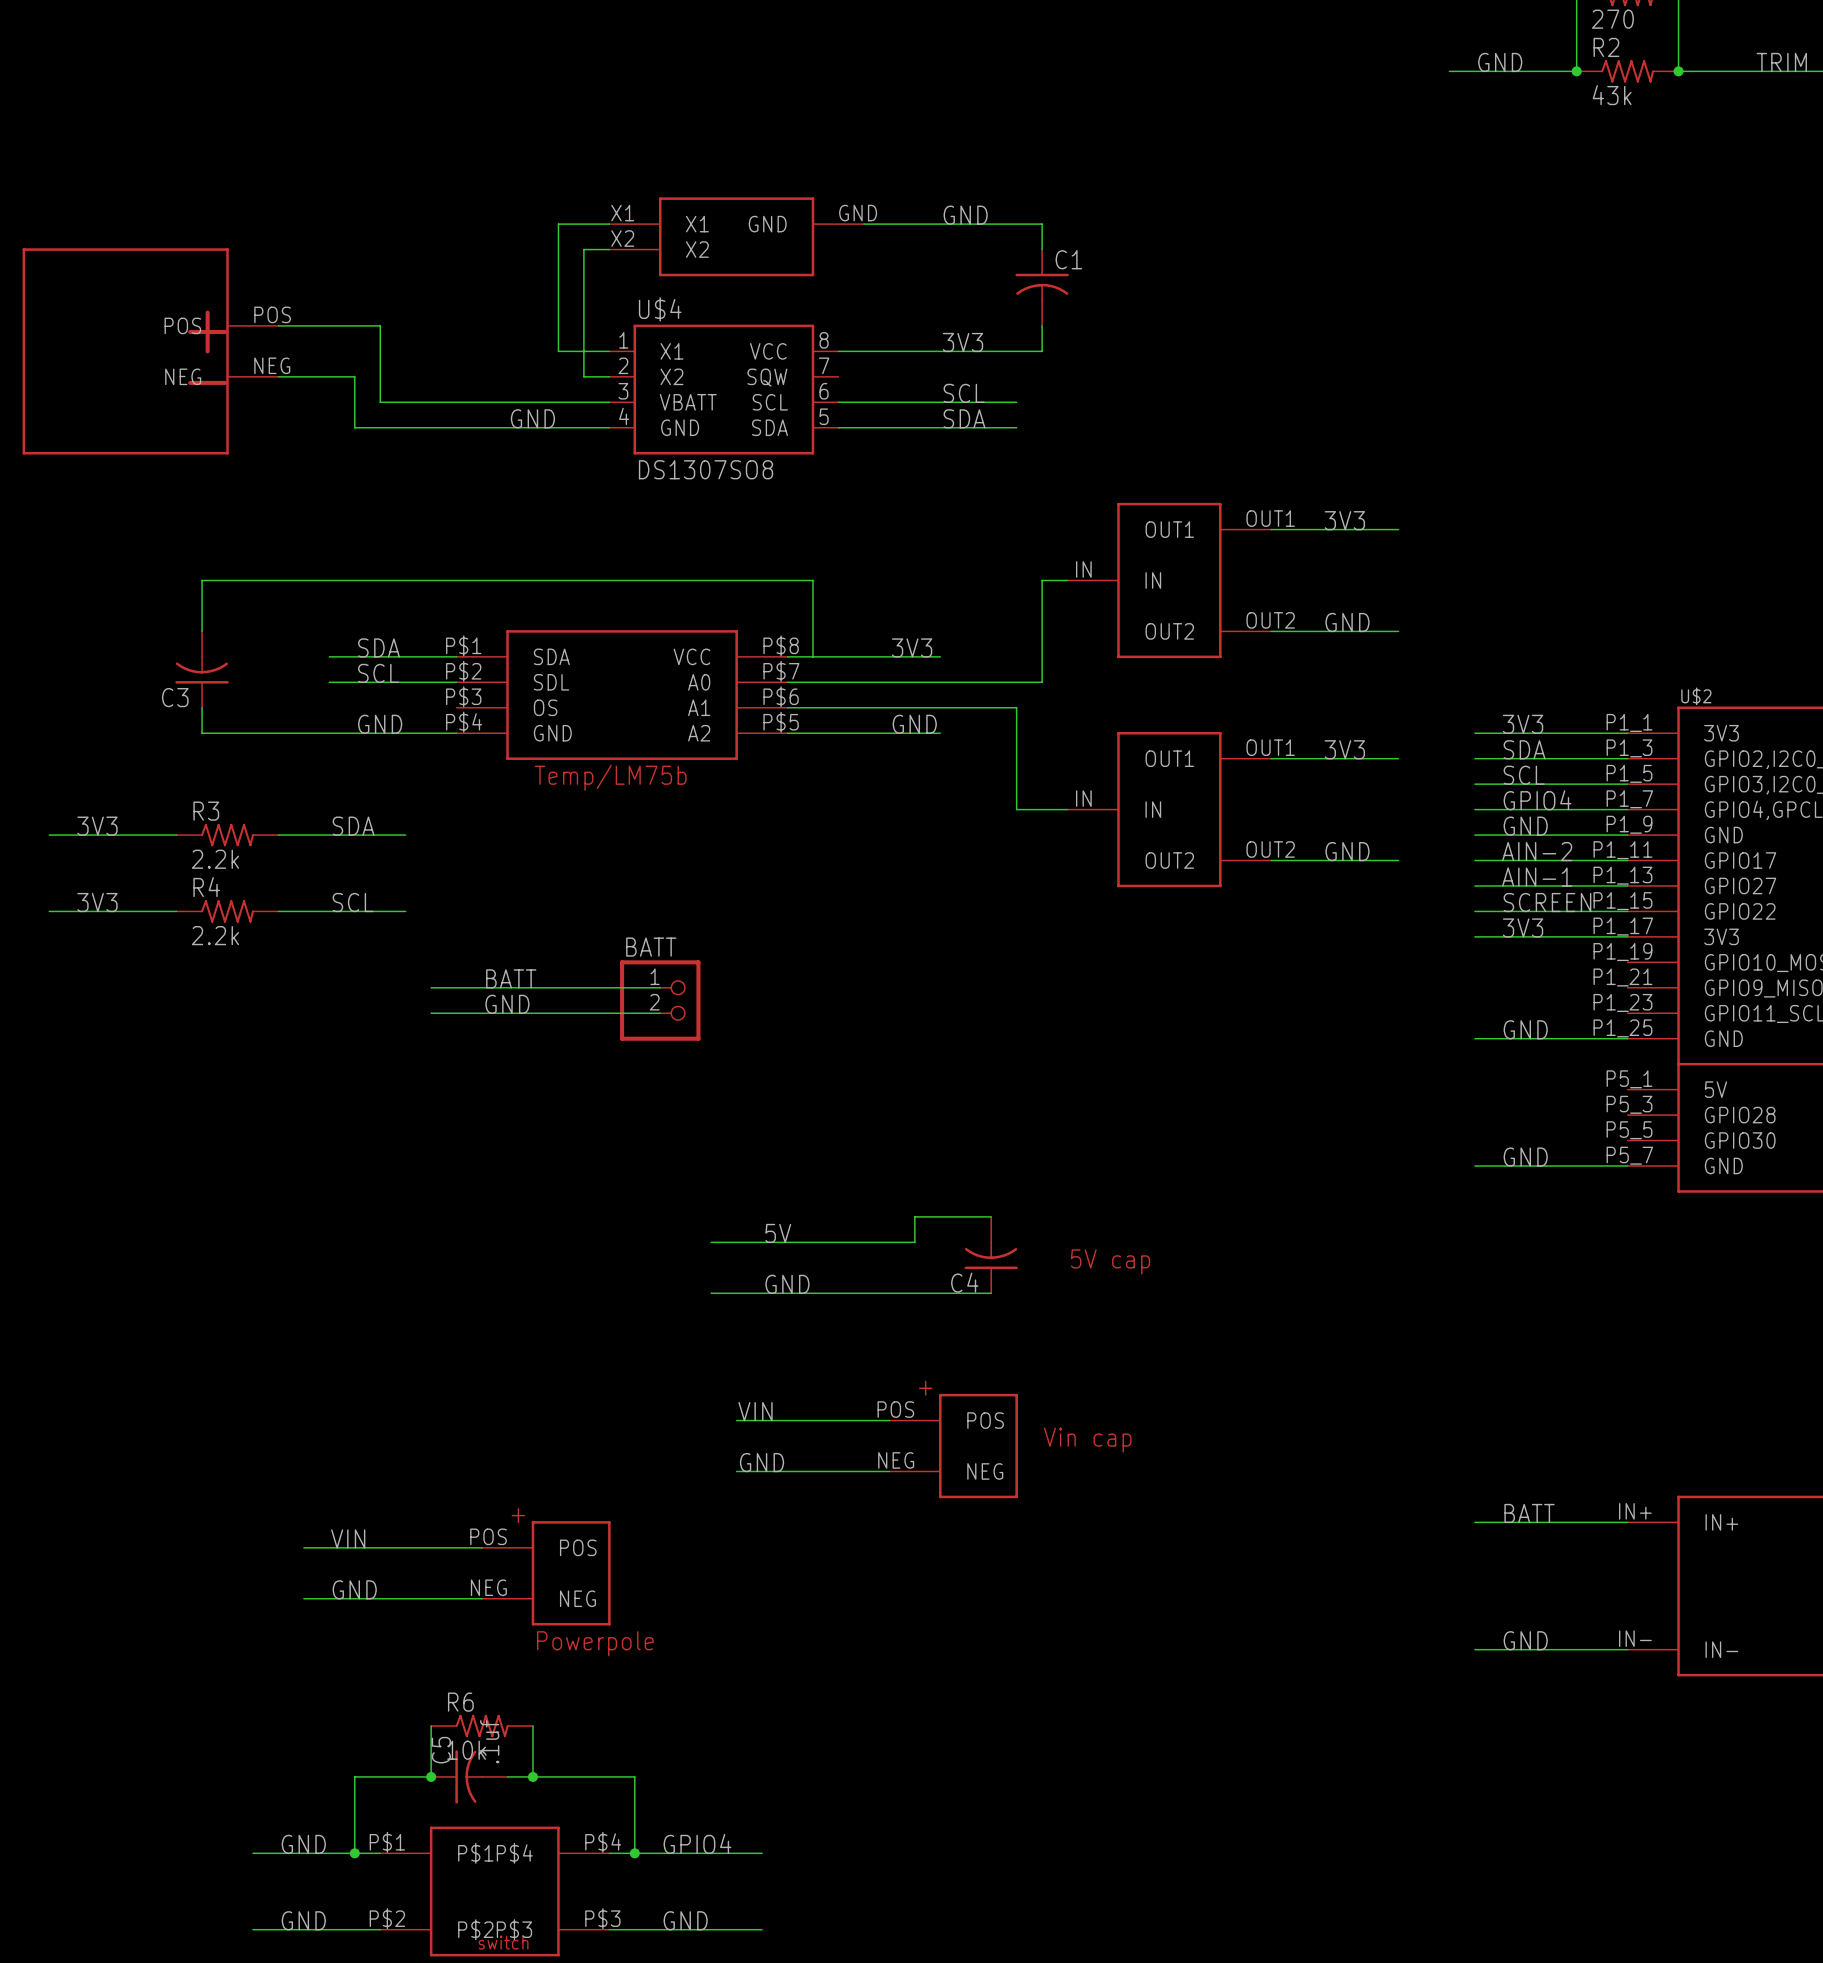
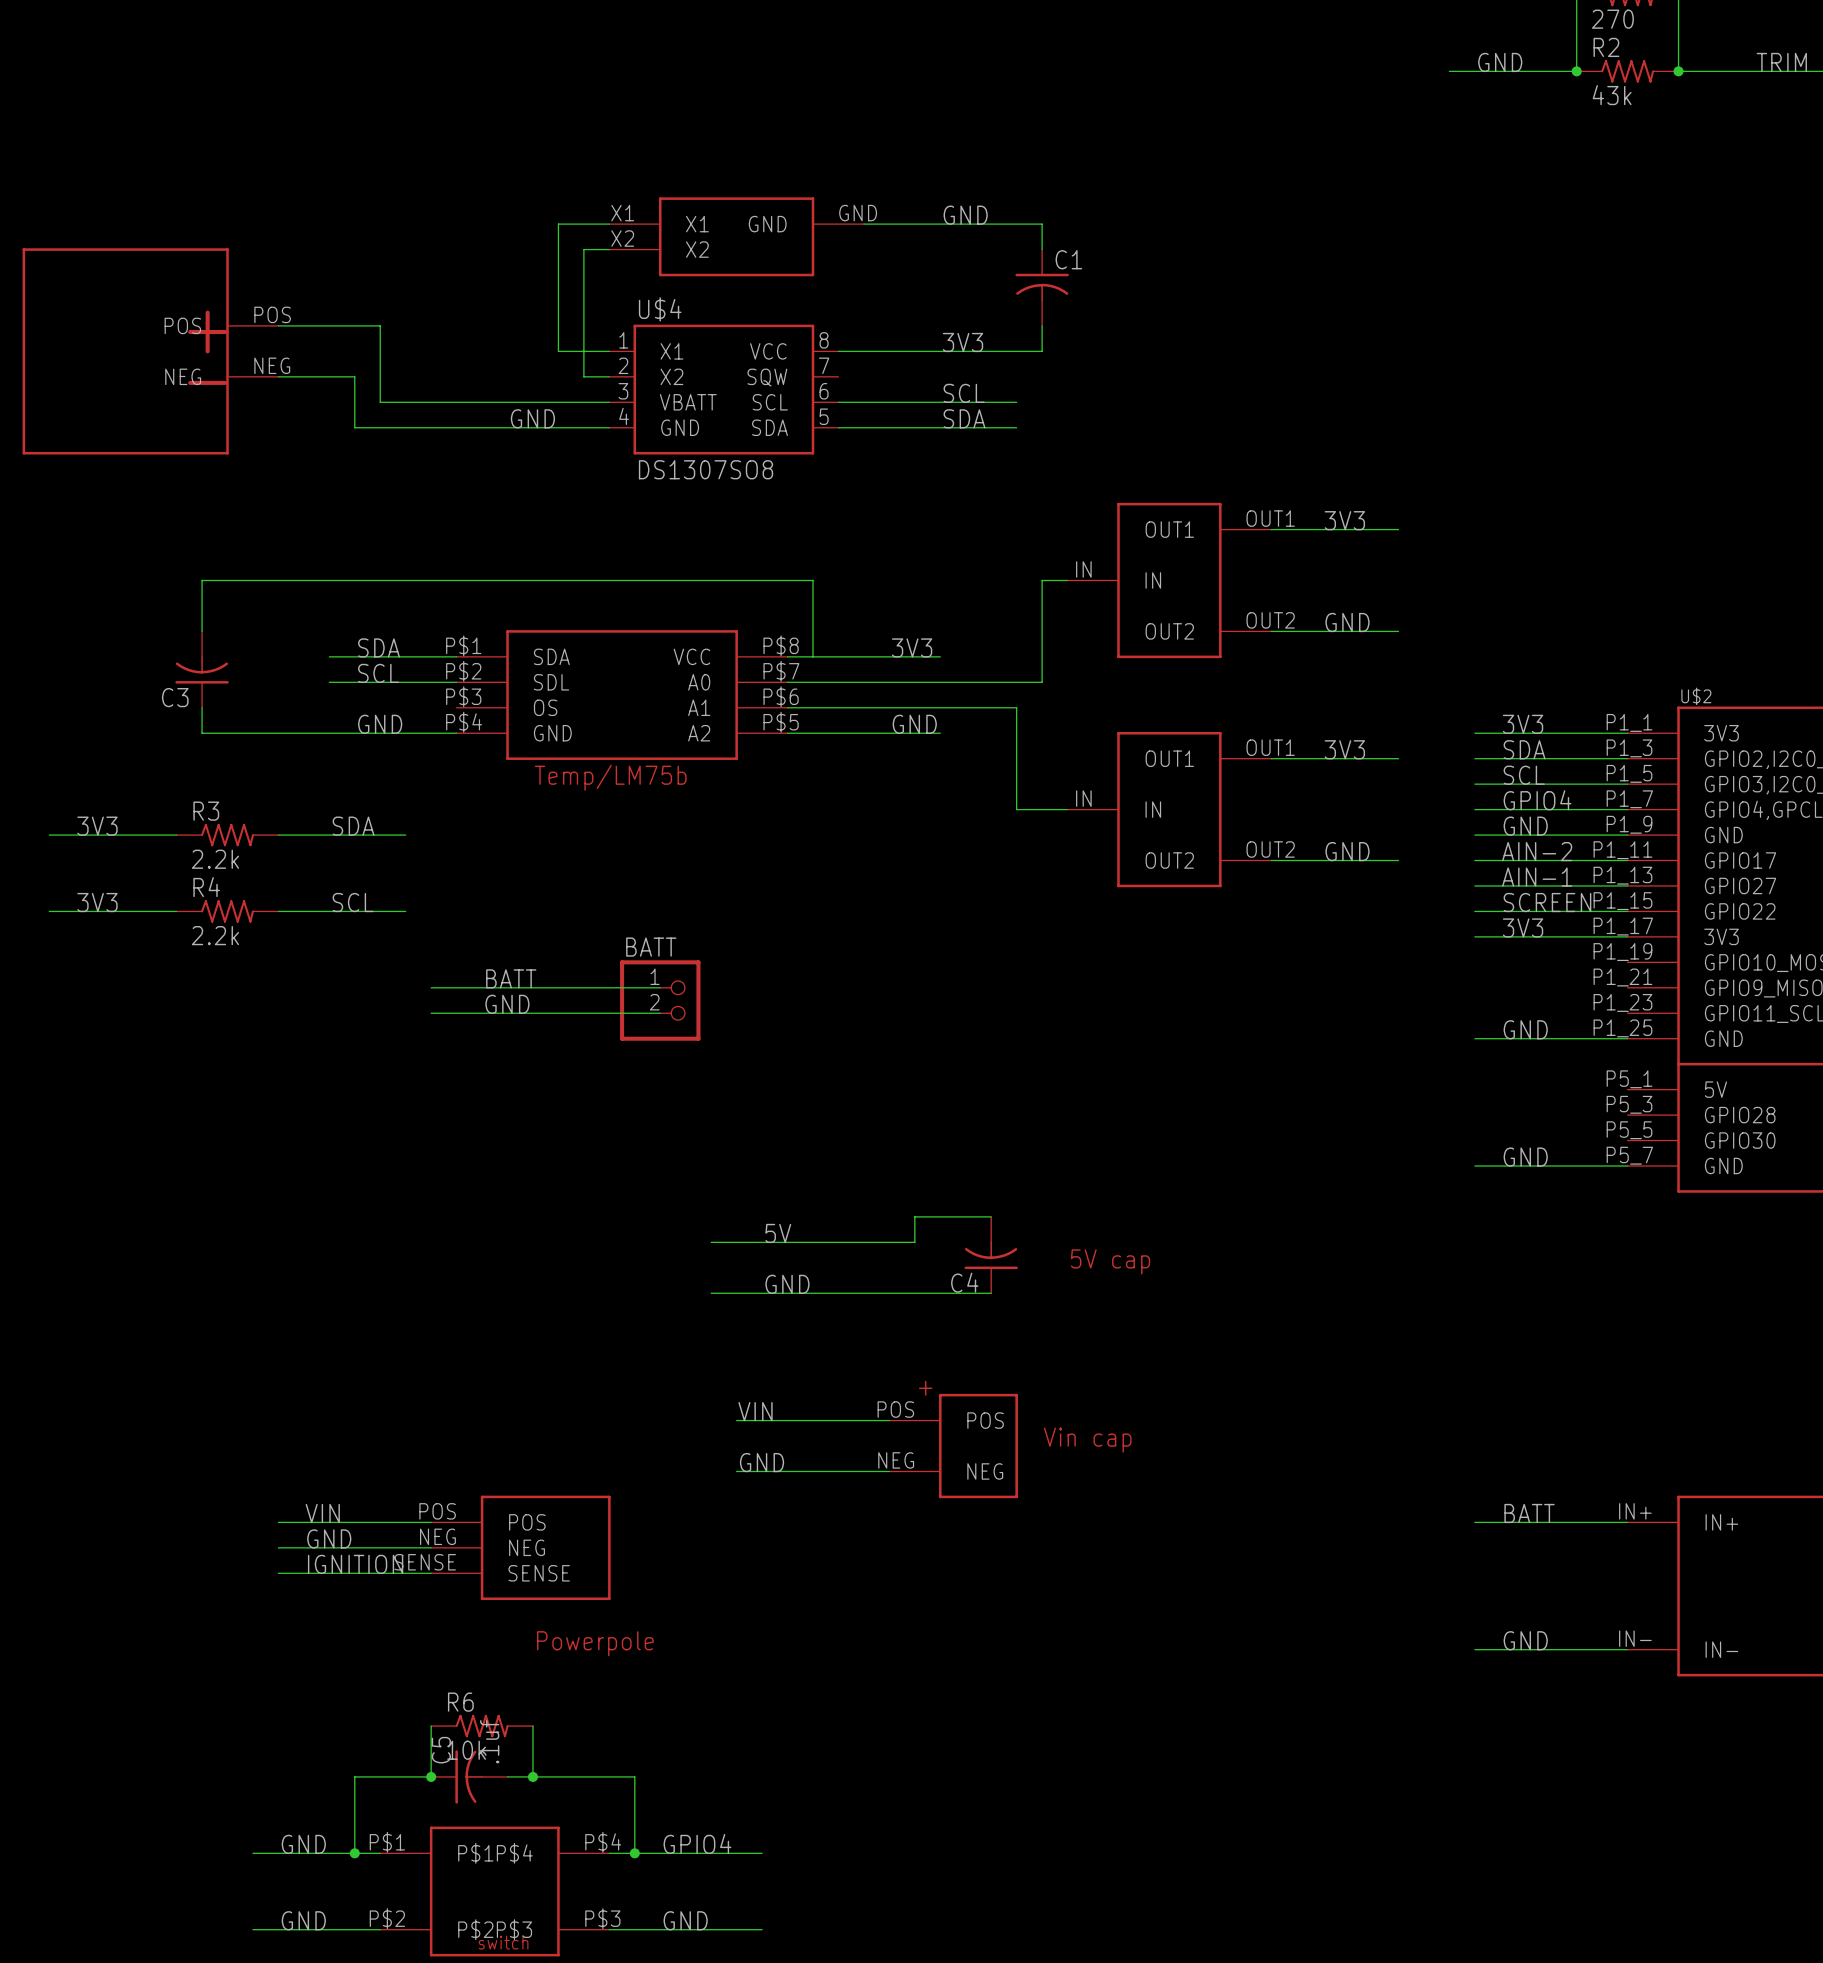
wire: none -> (278, 1522) (431, 1522)
label position: VIN (348, 1538) -> VIN (322, 1513)
wire: none -> (278, 1547) (303, 1547)
part: none -> (520, 1547)
label: none -> IGNITION (355, 1564)
wire: none -> (278, 1573) (431, 1573)
part: (546, 1573) -> none
label position: GND (354, 1589) -> GND (329, 1538)
wire: (303, 1598) (482, 1598) -> none

